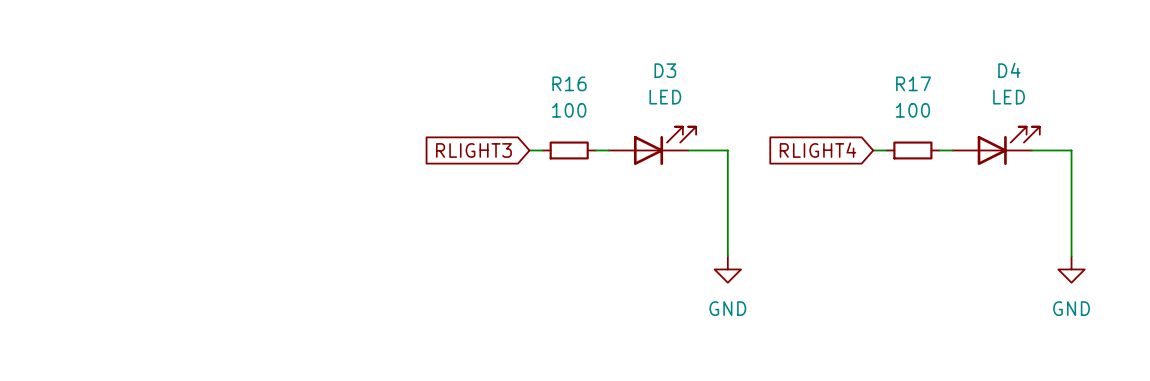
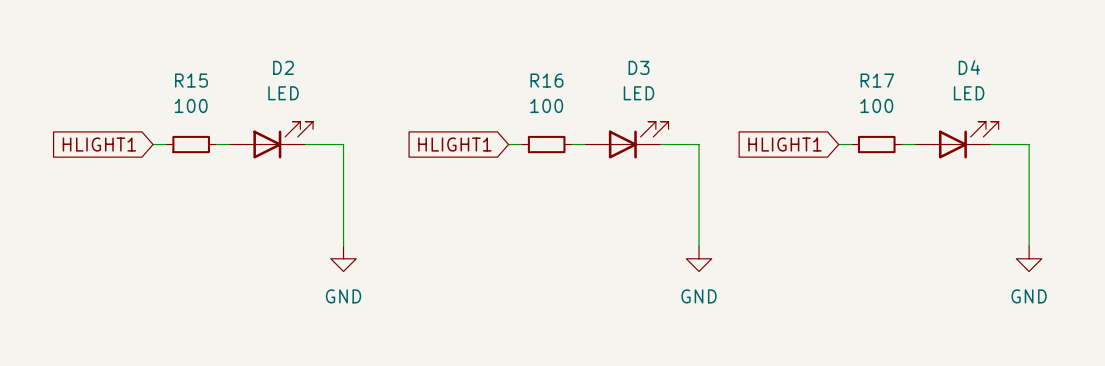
D2: none -> LED (271, 140)
global label: none -> HLIGHT1 (99, 144)
wire: none -> (153, 144) (165, 144)
R15: none -> 100 (191, 144)
wire: none -> (216, 144) (229, 144)
wire: none -> (305, 144) (343, 144) (343, 246)
global label: RLIGHT3 (473, 150) -> HLIGHT1 (454, 144)
global label: RLIGHT4 (817, 150) -> HLIGHT1 (784, 144)
power symbol: none -> GND (343, 258)

